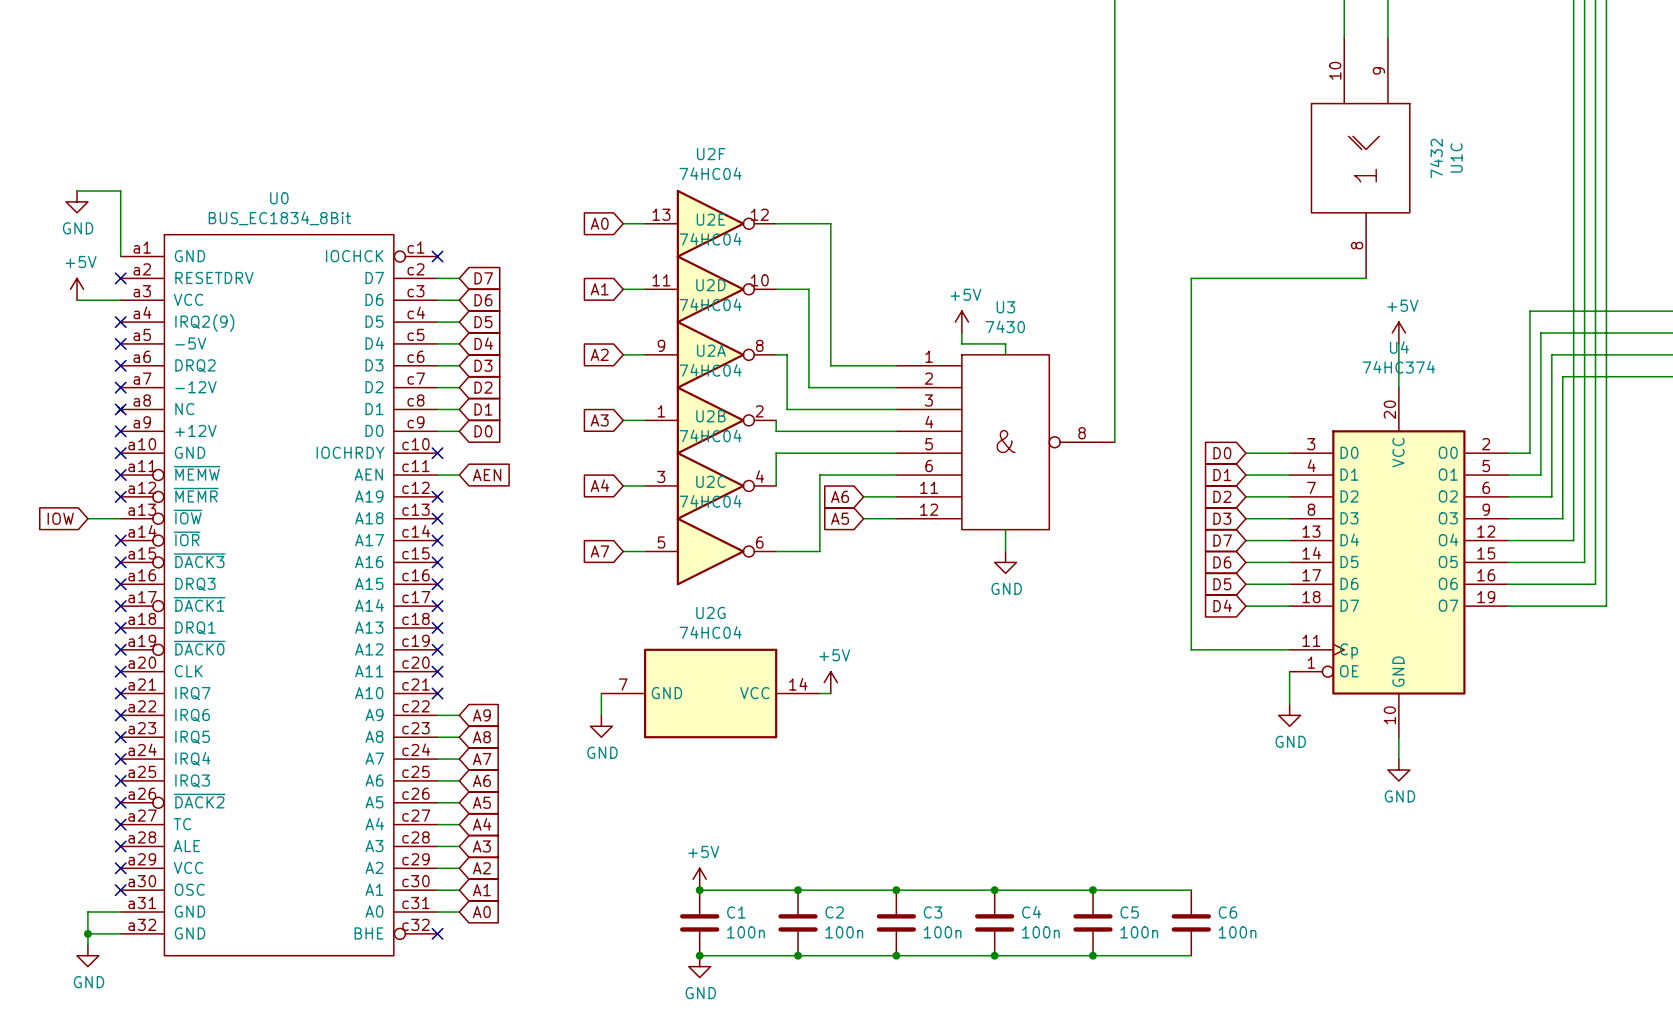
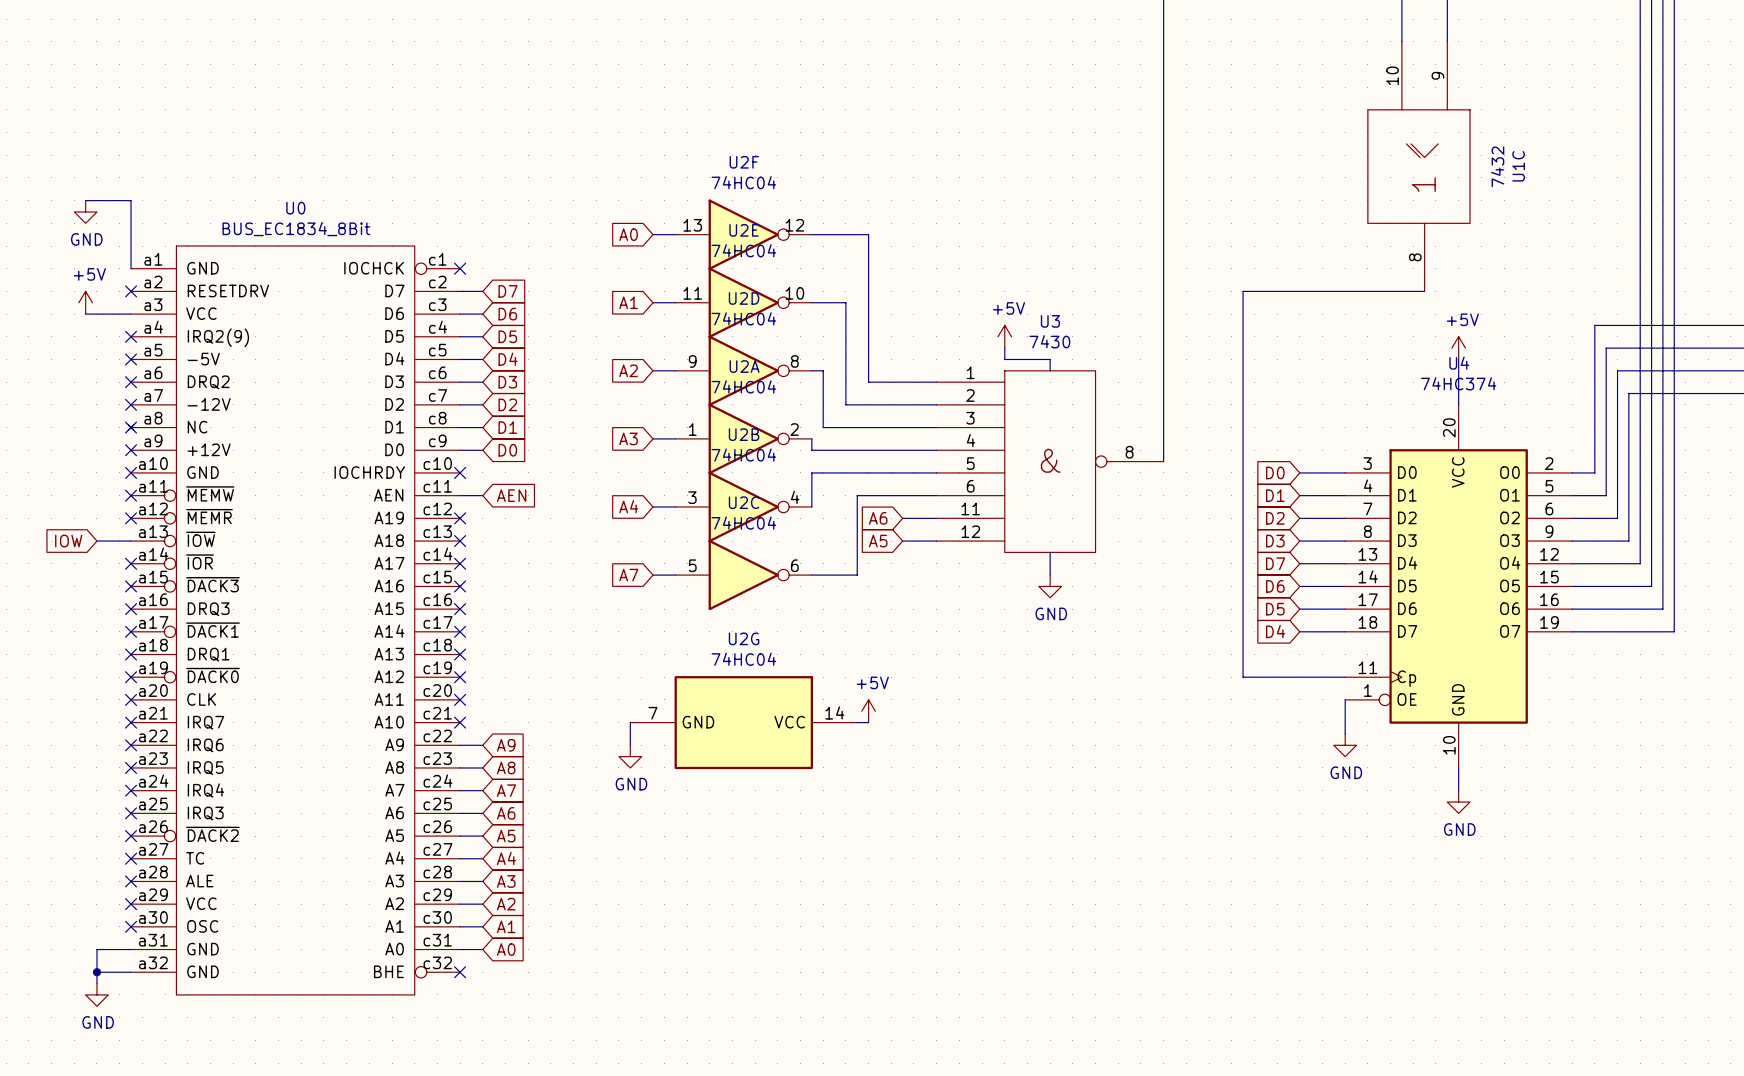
power symbol: +5V (699, 879) -> none
wire: (699, 890) (1191, 890) -> none
junction: (699, 890) -> none
junction: (798, 890) -> none
junction: (896, 890) -> none
junction: (994, 890) -> none
junction: (1092, 890) -> none
C1: 100n (699, 922) -> none
C2: 100n (798, 922) -> none
C3: 100n (896, 922) -> none
C4: 100n (994, 922) -> none
C5: 100n (1092, 922) -> none
C6: 100n (1191, 922) -> none
wire: (699, 955) (1191, 955) -> none
junction: (699, 955) -> none
junction: (798, 955) -> none
junction: (896, 955) -> none
junction: (994, 955) -> none
junction: (1092, 955) -> none
power symbol: GND (699, 966) -> none

